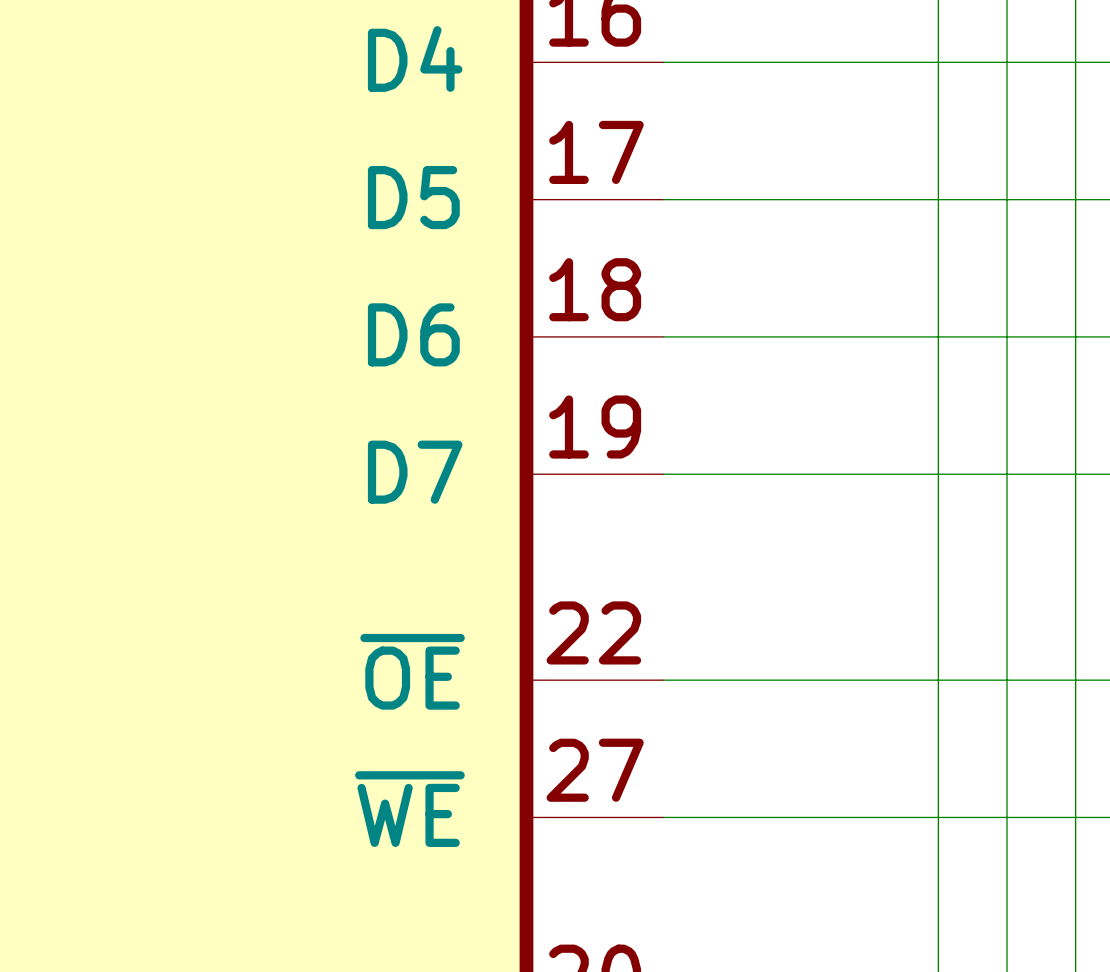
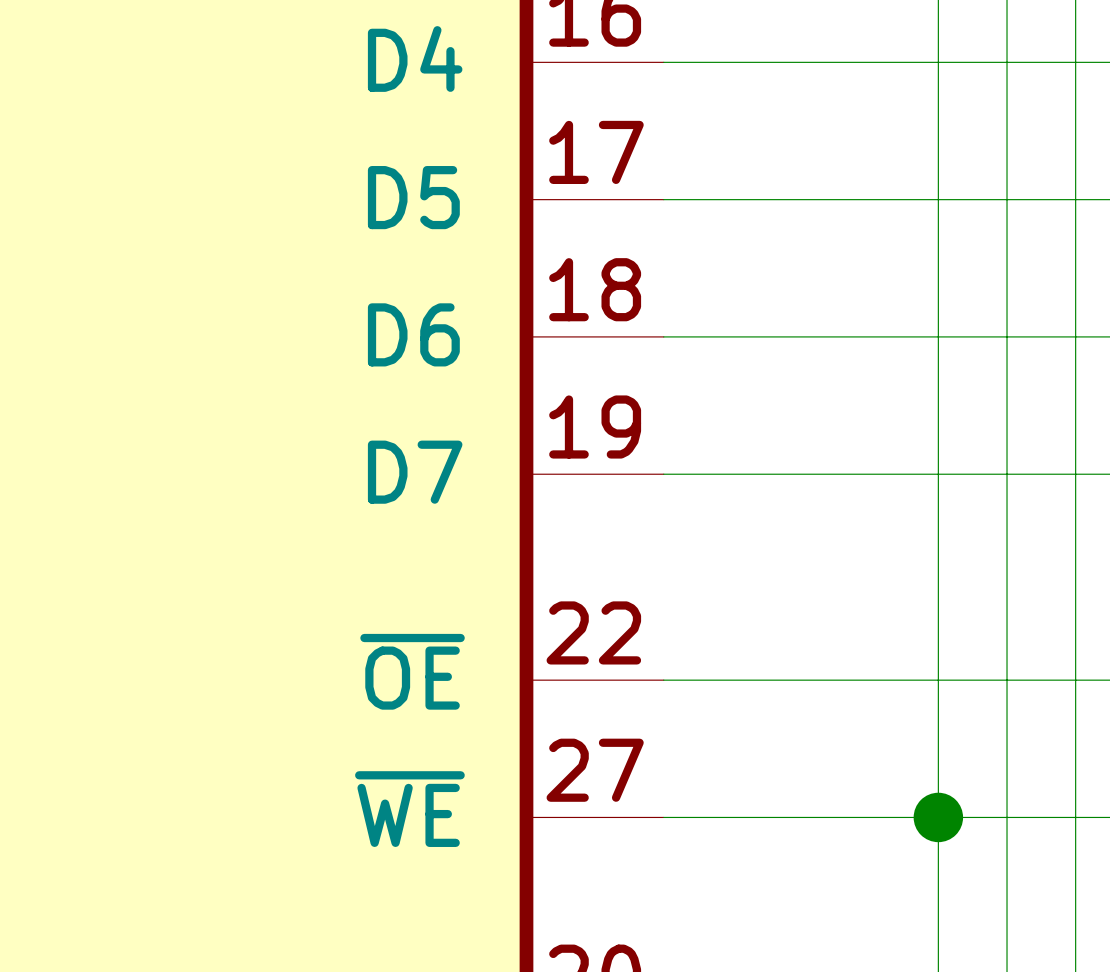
junction: none -> (938, 817)

